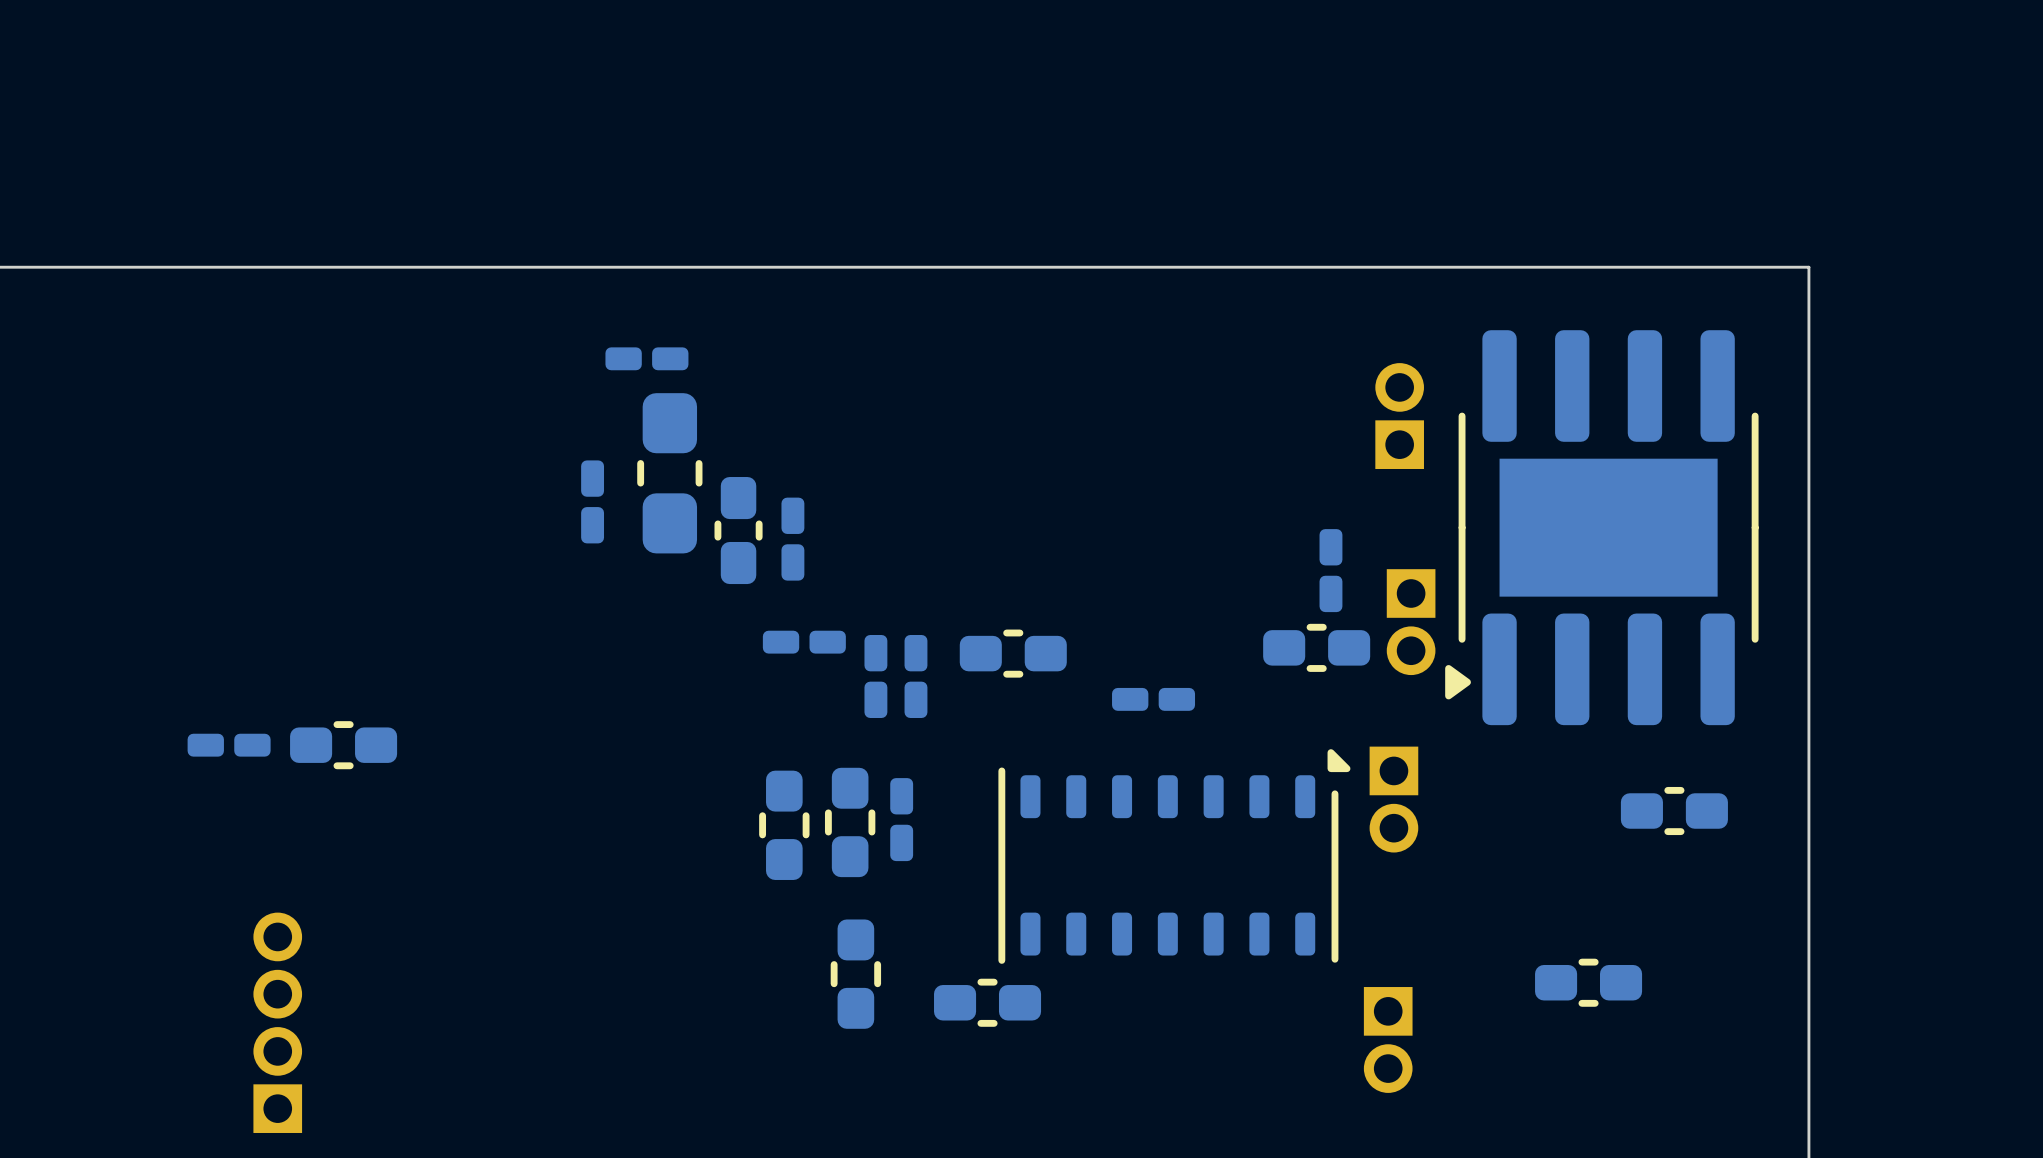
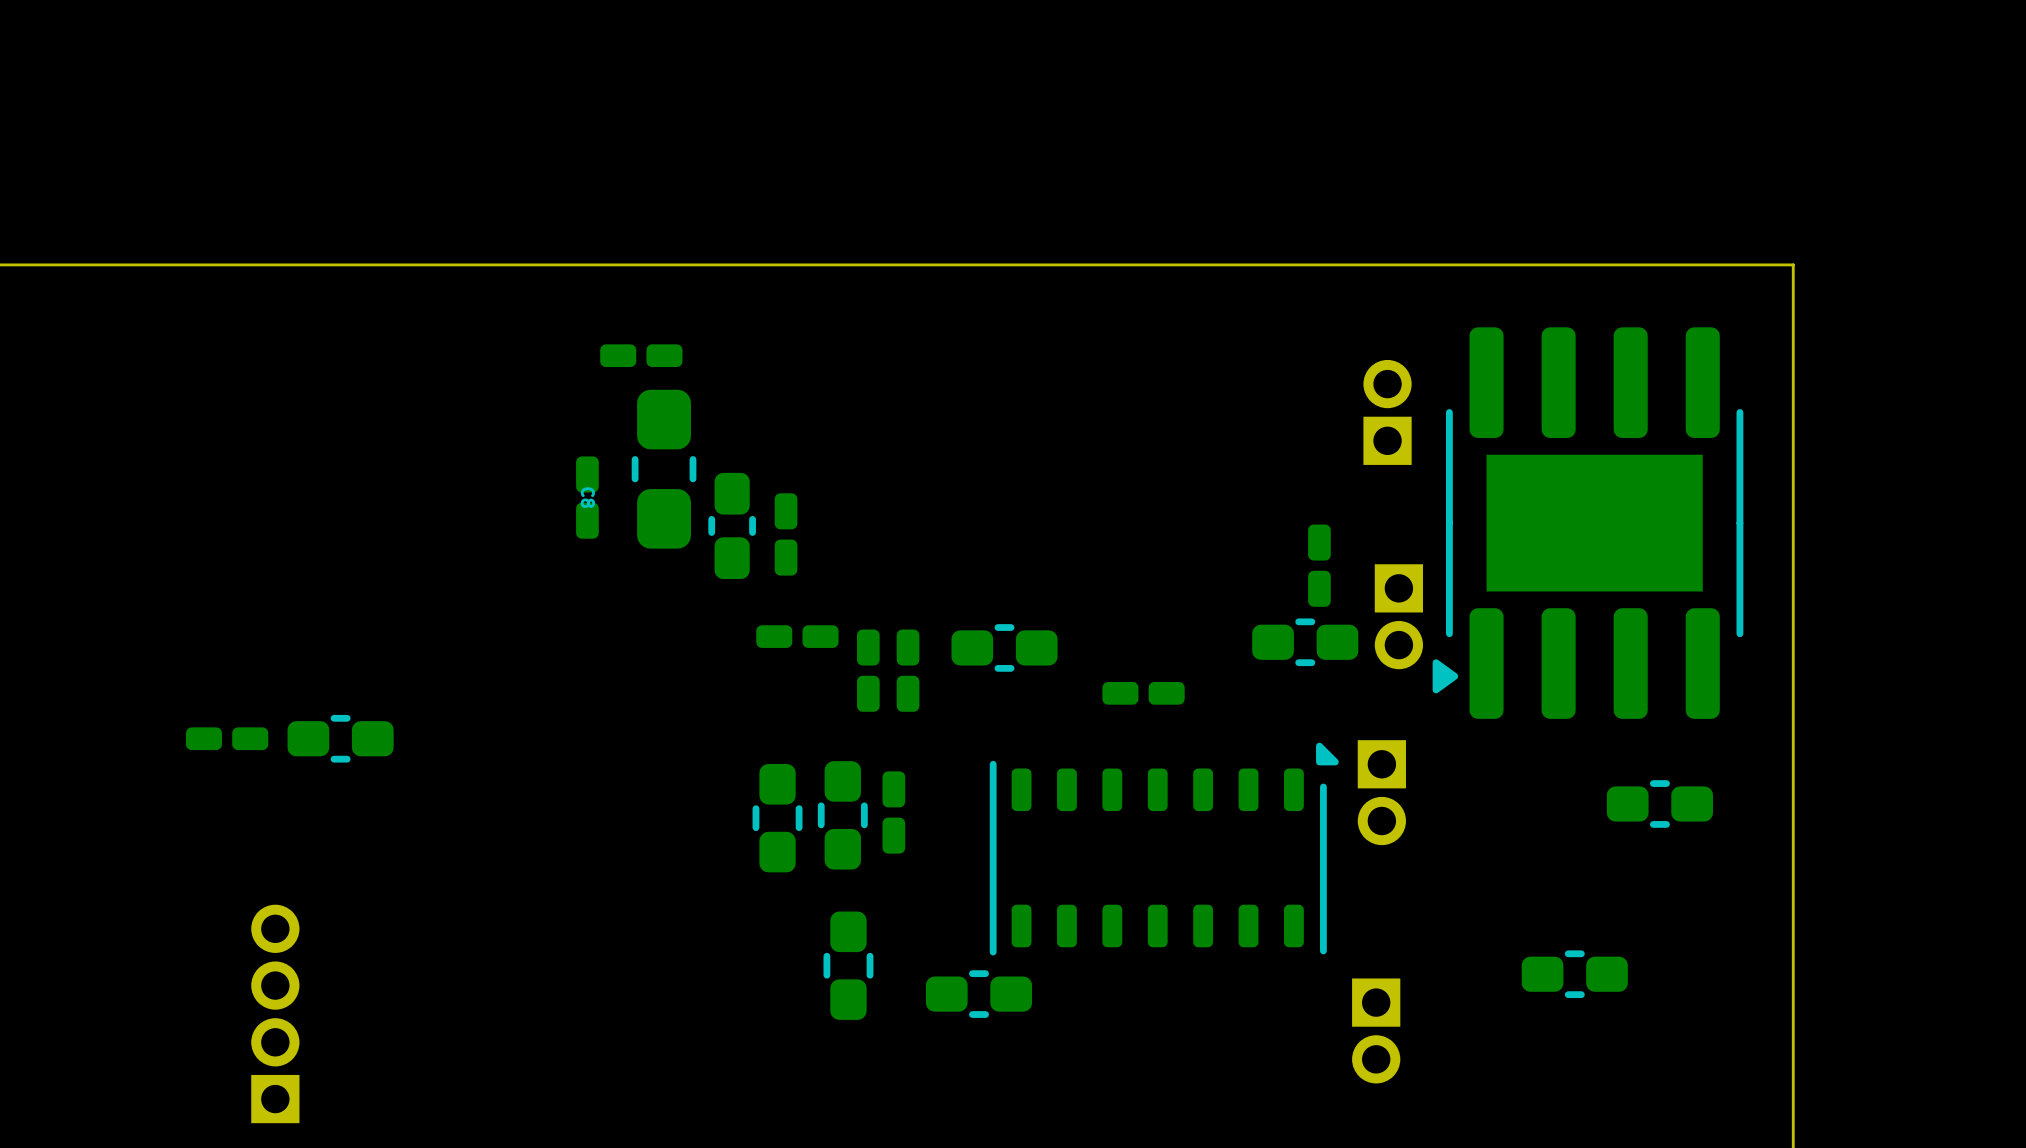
C8 name: none -> C8 (587, 497)

